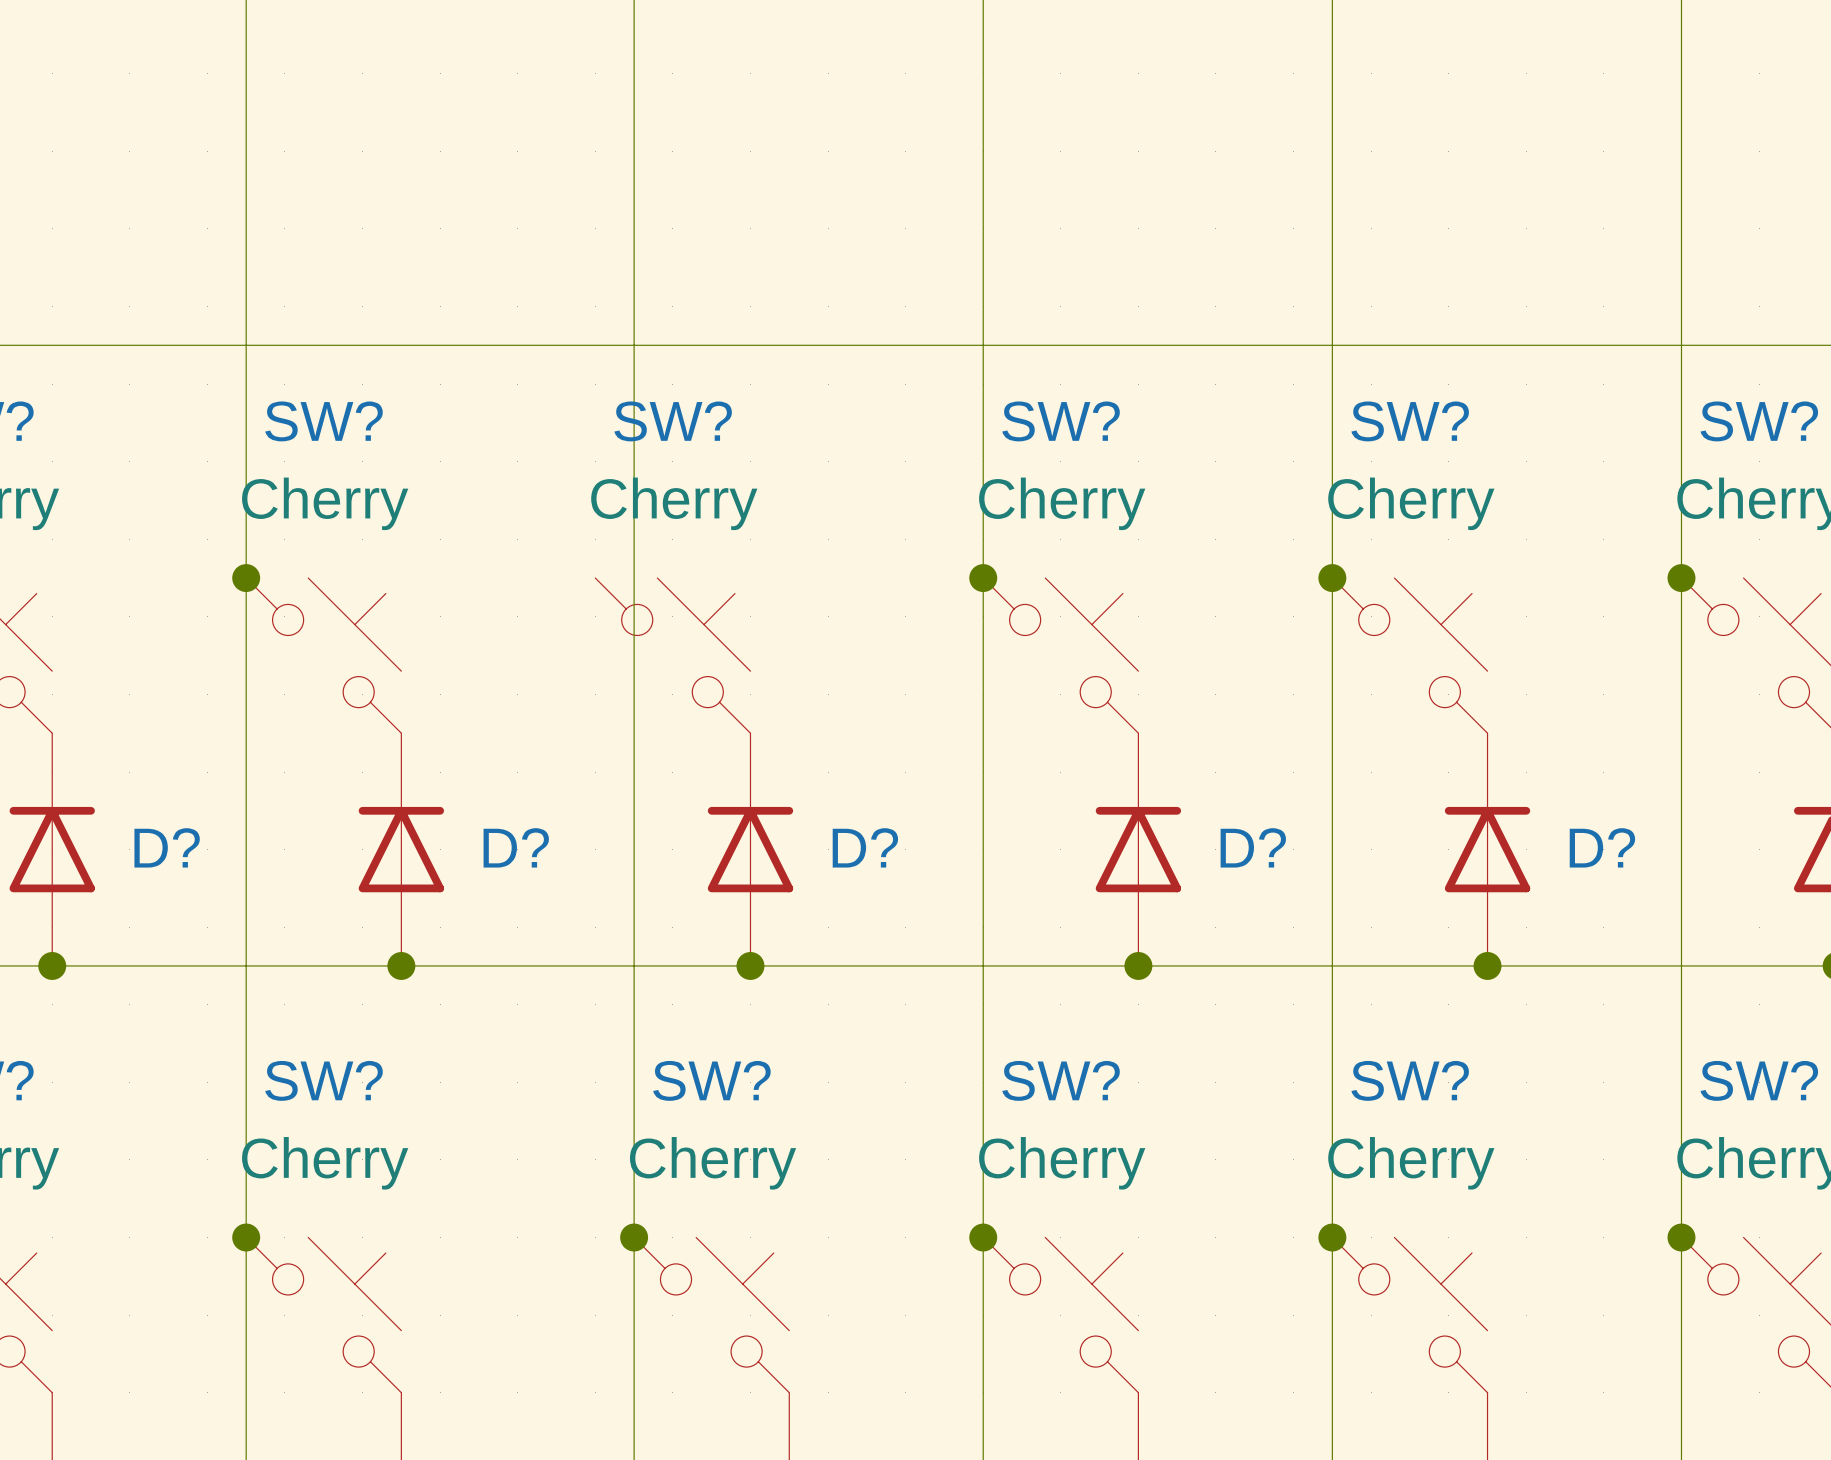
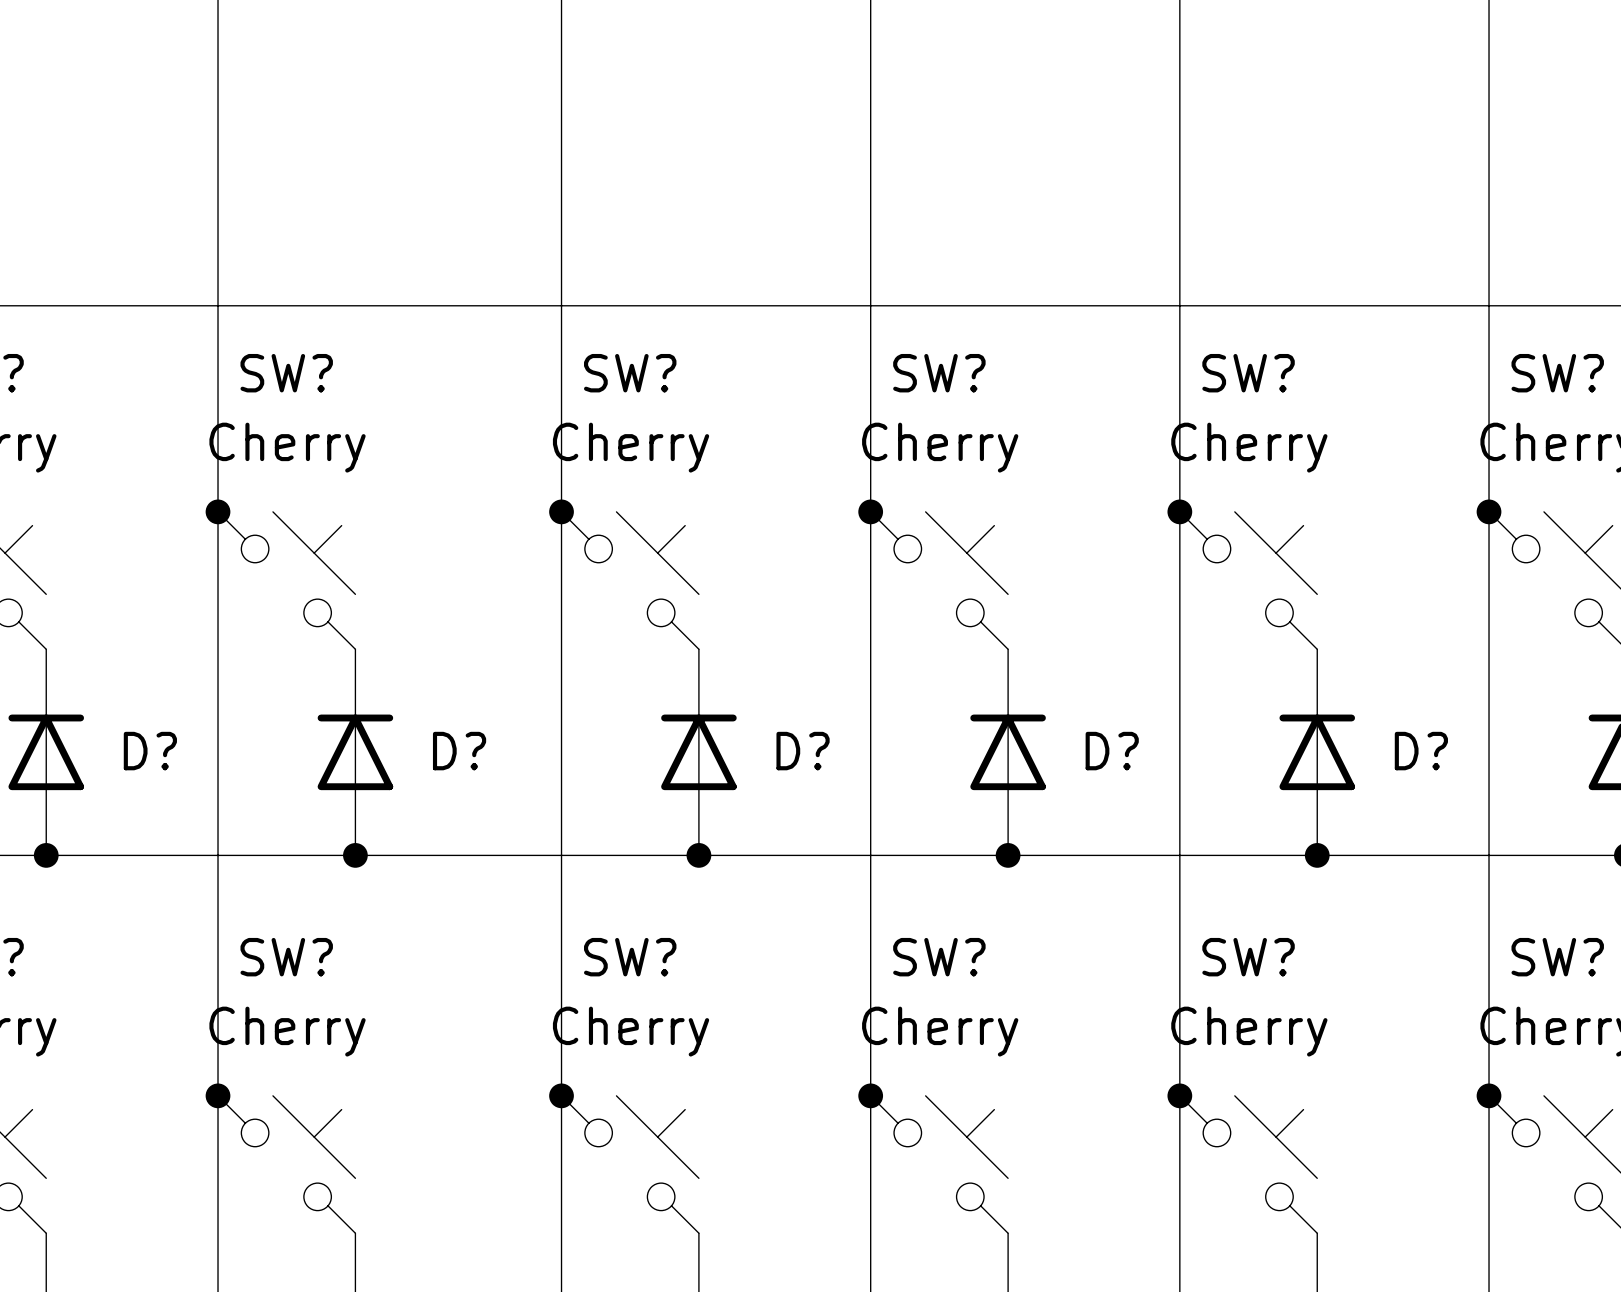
junction: none -> (561, 511)
SW? position: (672, 655) -> (630, 580)
D? position: (750, 849) -> (698, 752)
junction position: (750, 965) -> (698, 855)

